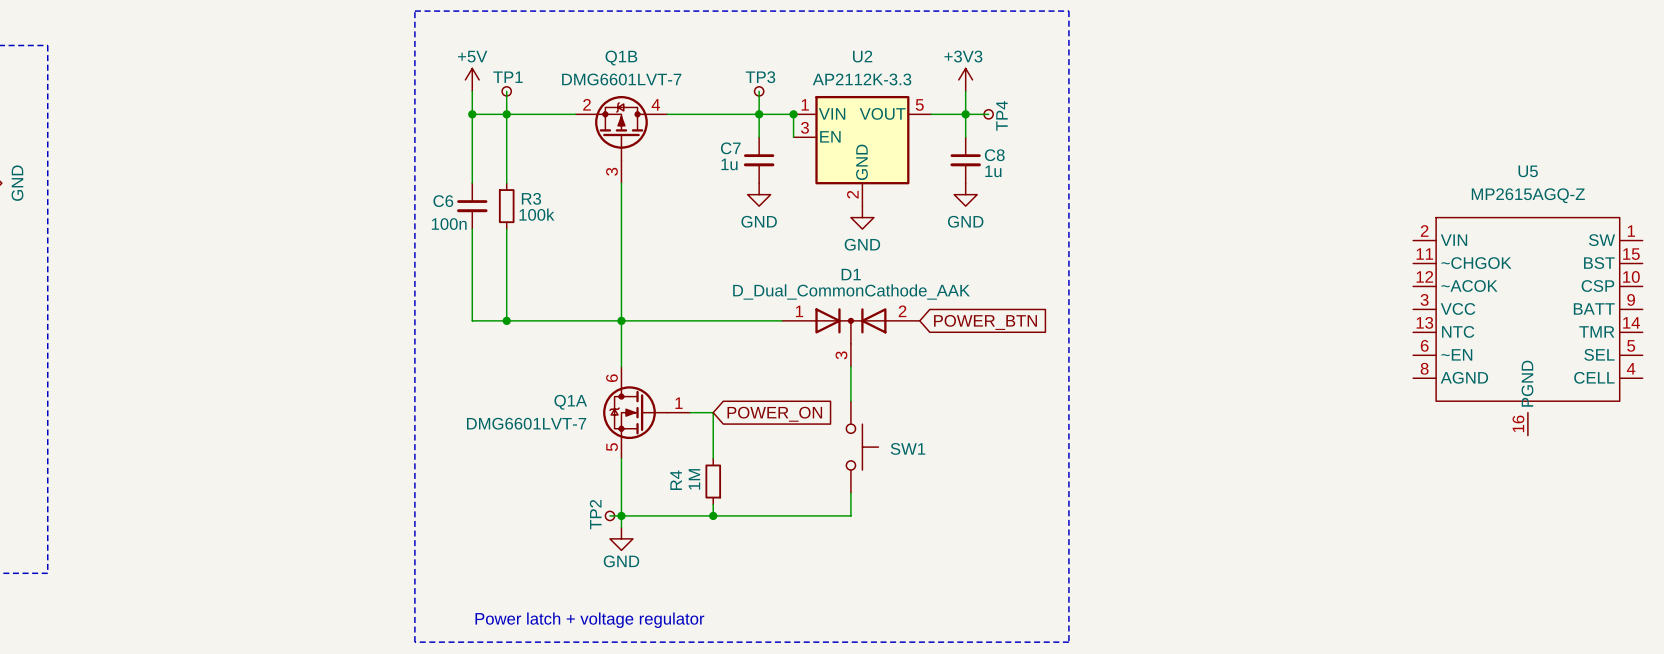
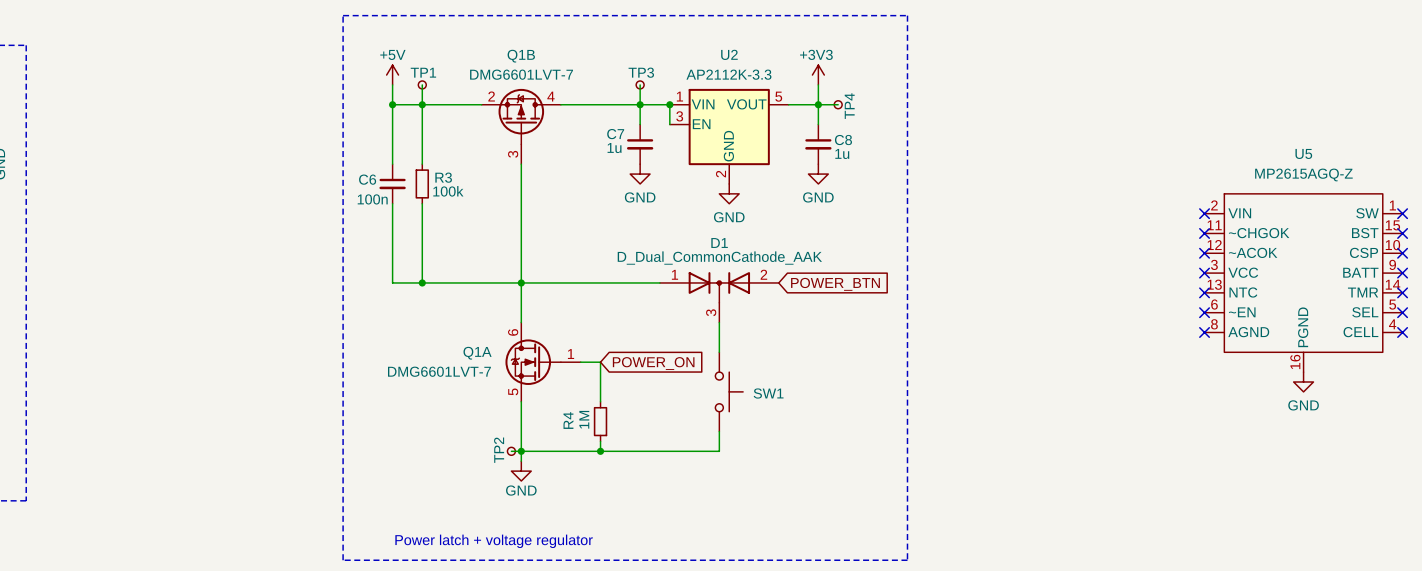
U5 symbol: [1413, 217, 1643, 436] -> [1204, 193, 1403, 373]
no-connect mark: none -> (1204, 213)
no-connect mark: none -> (1402, 213)
no-connect mark: none -> (1204, 233)
no-connect mark: none -> (1402, 233)
no-connect mark: none -> (1204, 253)
no-connect mark: none -> (1402, 253)
no-connect mark: none -> (1204, 273)
no-connect mark: none -> (1402, 273)
no-connect mark: none -> (1204, 292)
no-connect mark: none -> (1402, 292)
no-connect mark: none -> (1204, 312)
no-connect mark: none -> (1402, 312)
no-connect mark: none -> (1204, 332)
no-connect mark: none -> (1402, 332)
power symbol: none -> GND (1303, 382)

